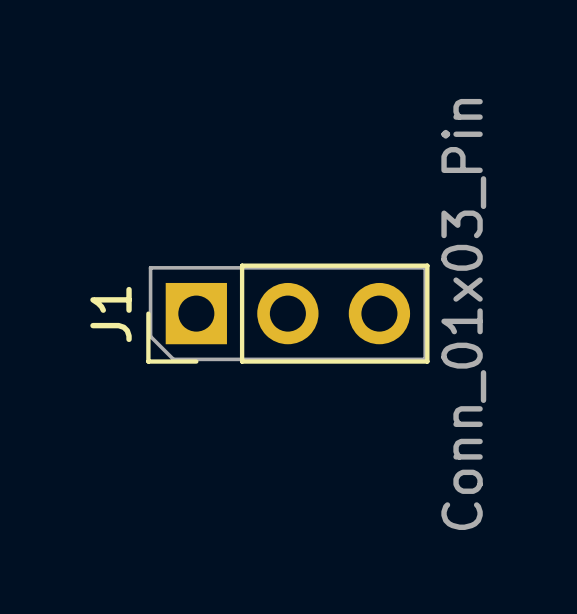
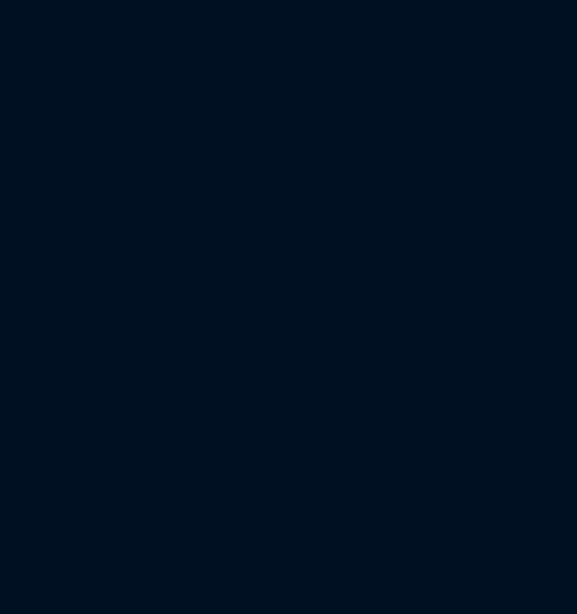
J1: Conn_01x03_Pin (287, 313) -> none

